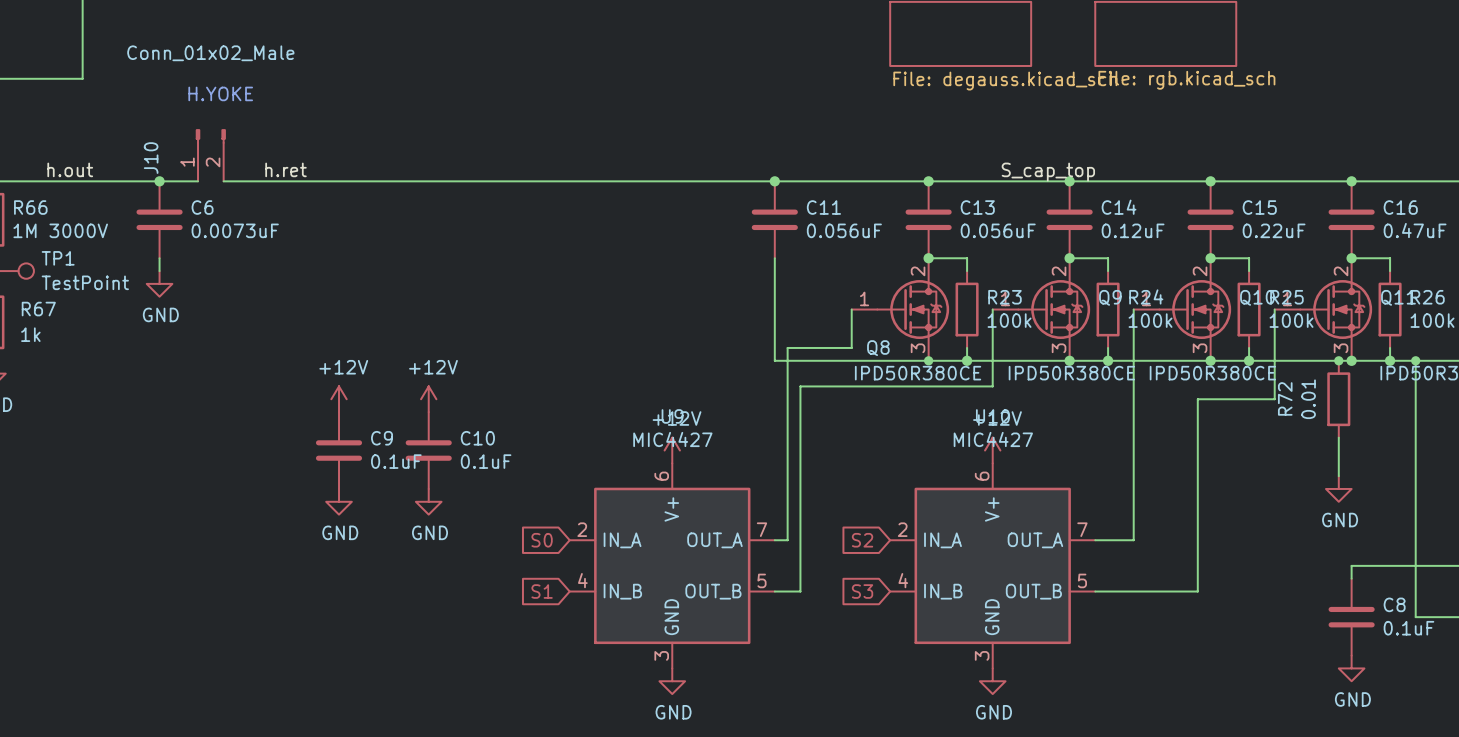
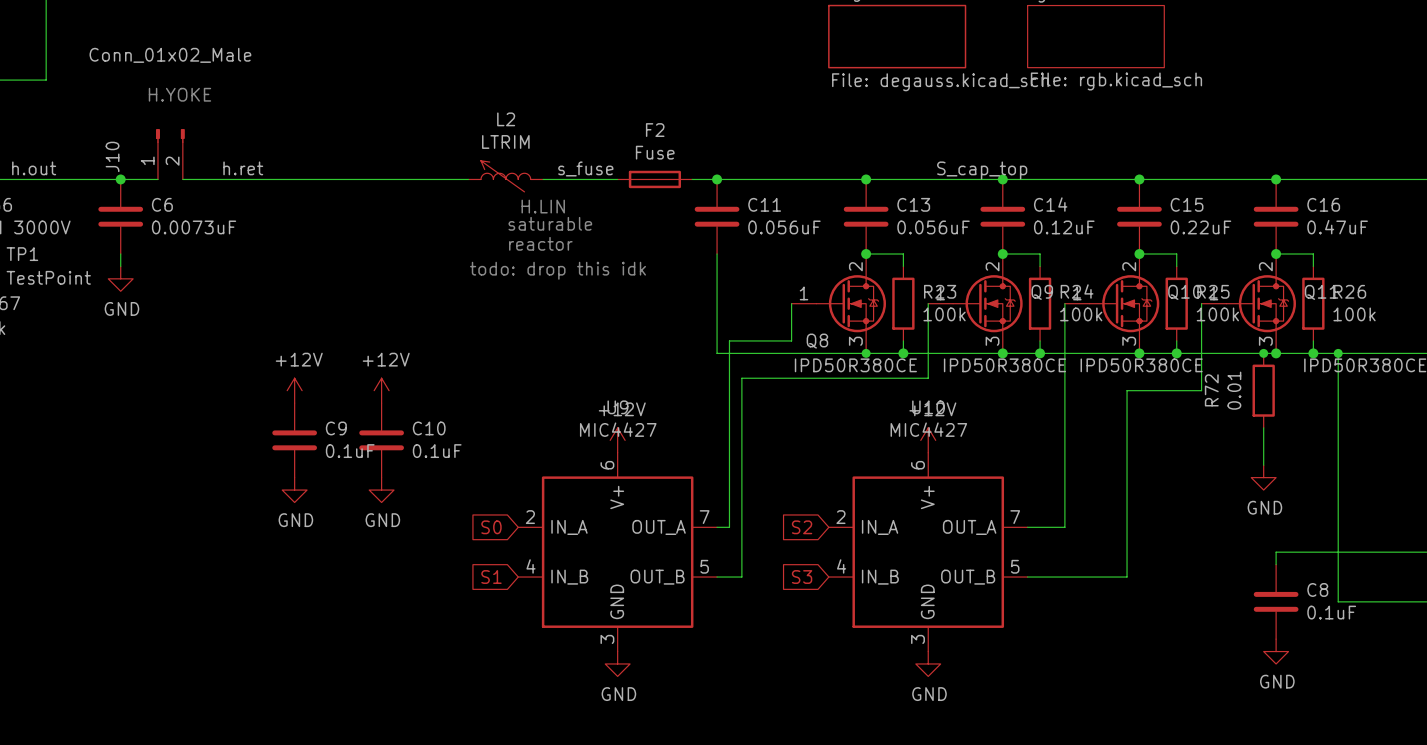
label: none -> s_fuse (585, 168)
L2: none -> LTRIM (505, 176)
wire: (518, 181) (595, 181) -> none
F2: none -> Fuse (654, 179)
text: none -> H.LIN (543, 206)
text: none -> saturable (550, 223)
text: none -> reactor (540, 243)
text: none -> todo: drop this idk (558, 270)

